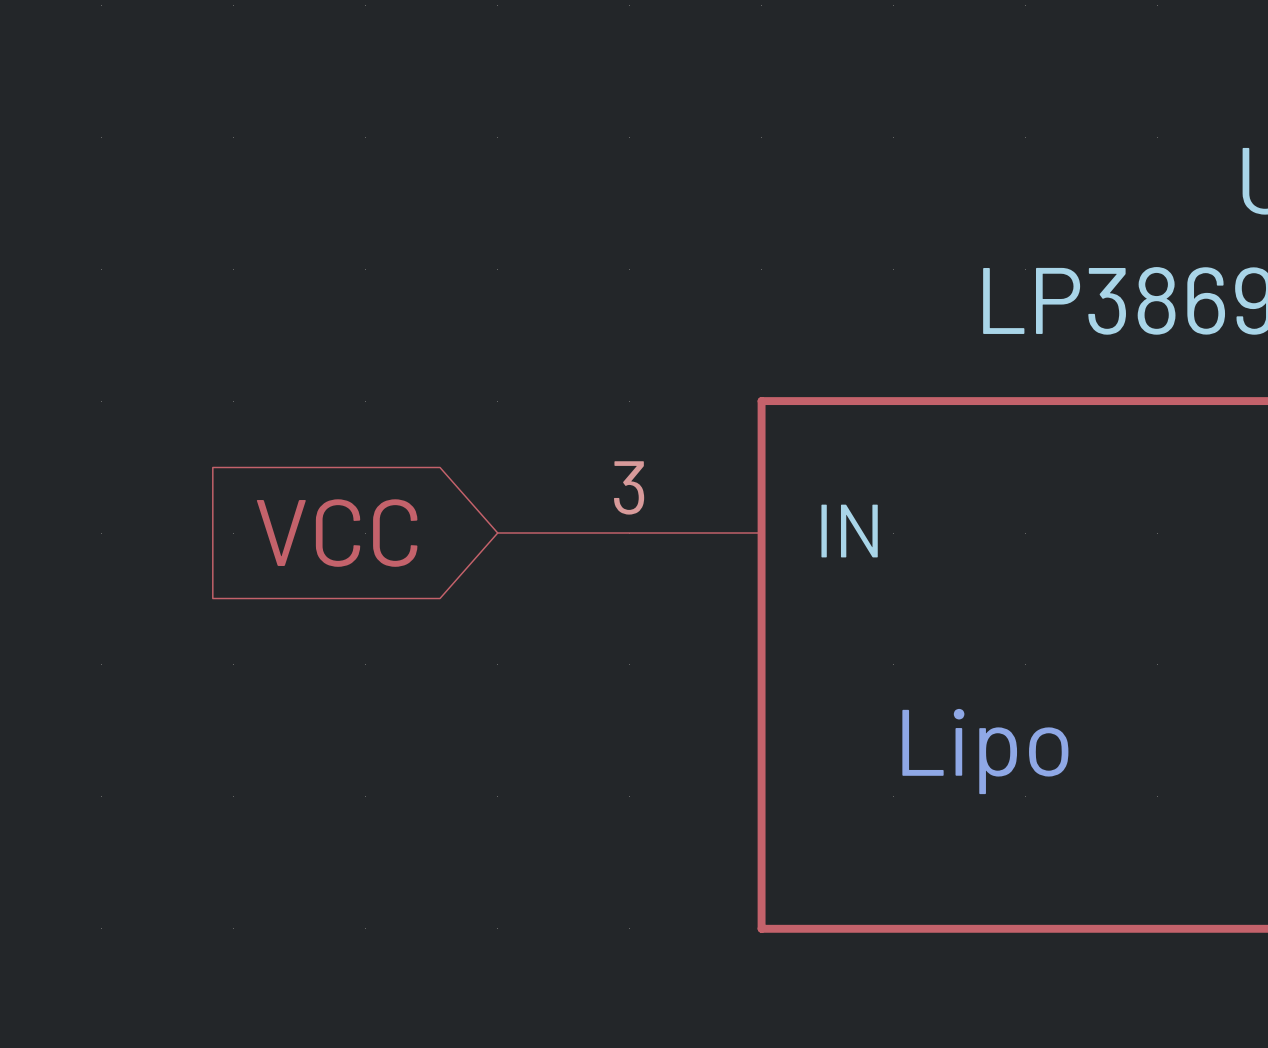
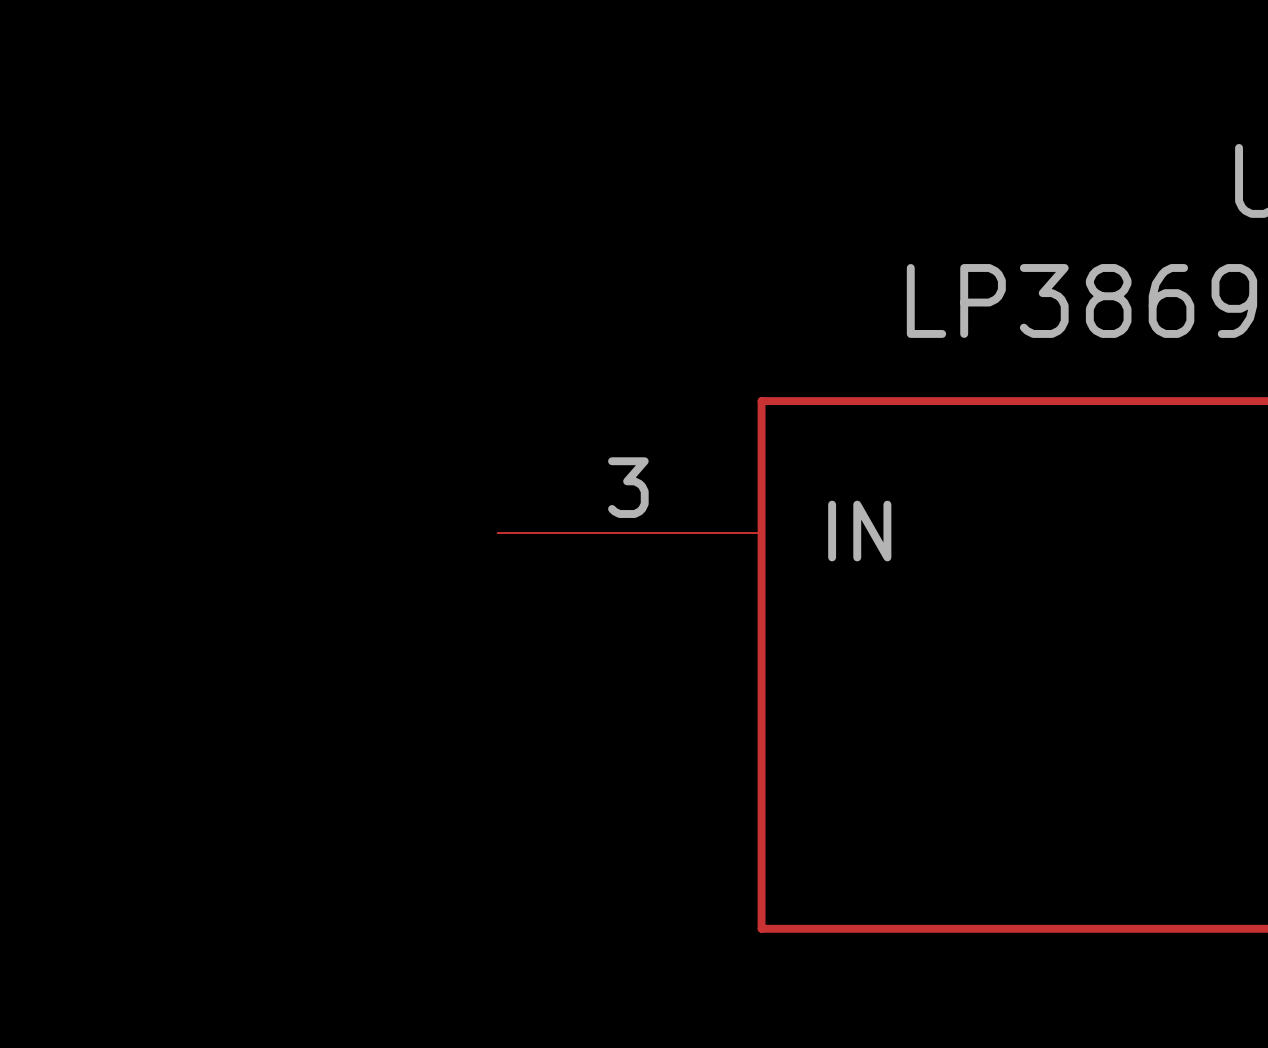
global label: VCC (337, 533) -> none
text: Lipo (985, 751) -> none

